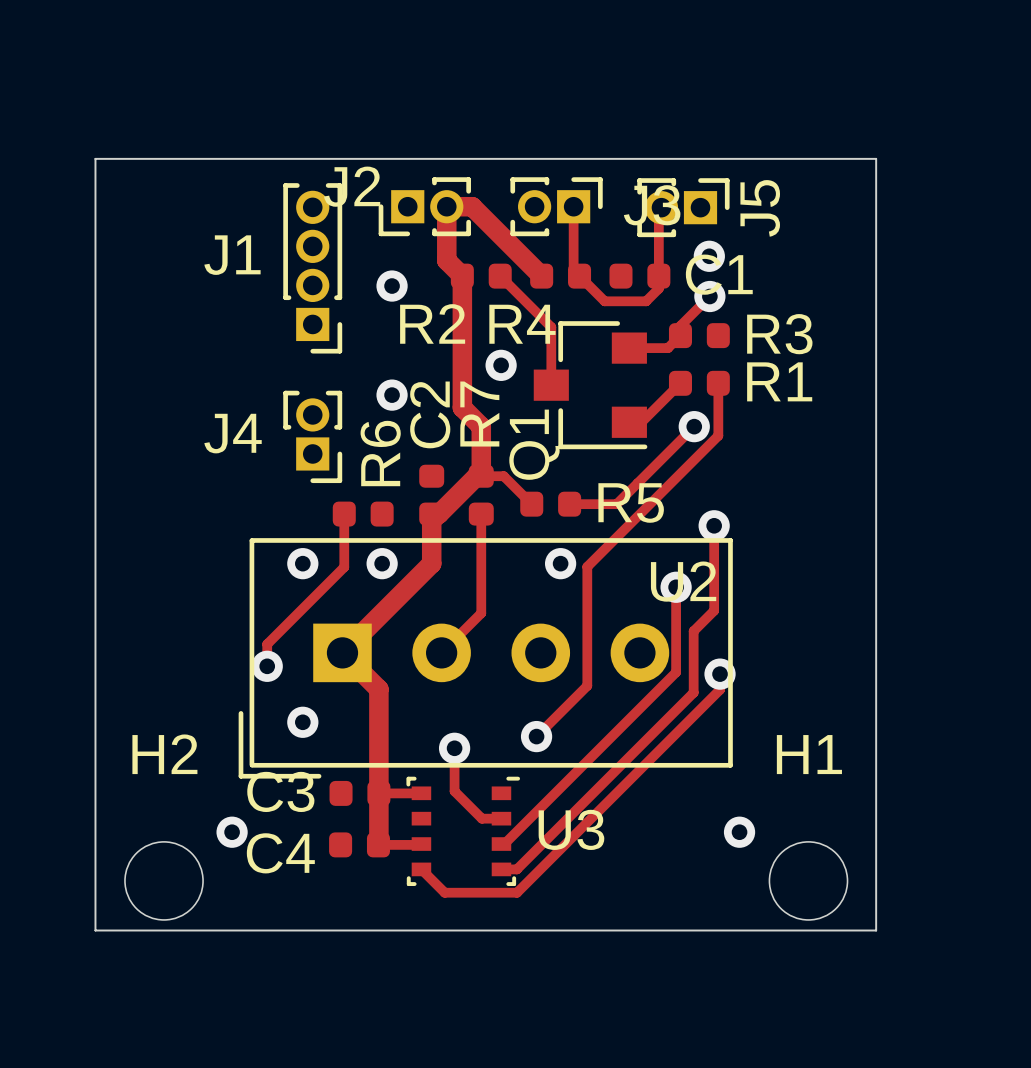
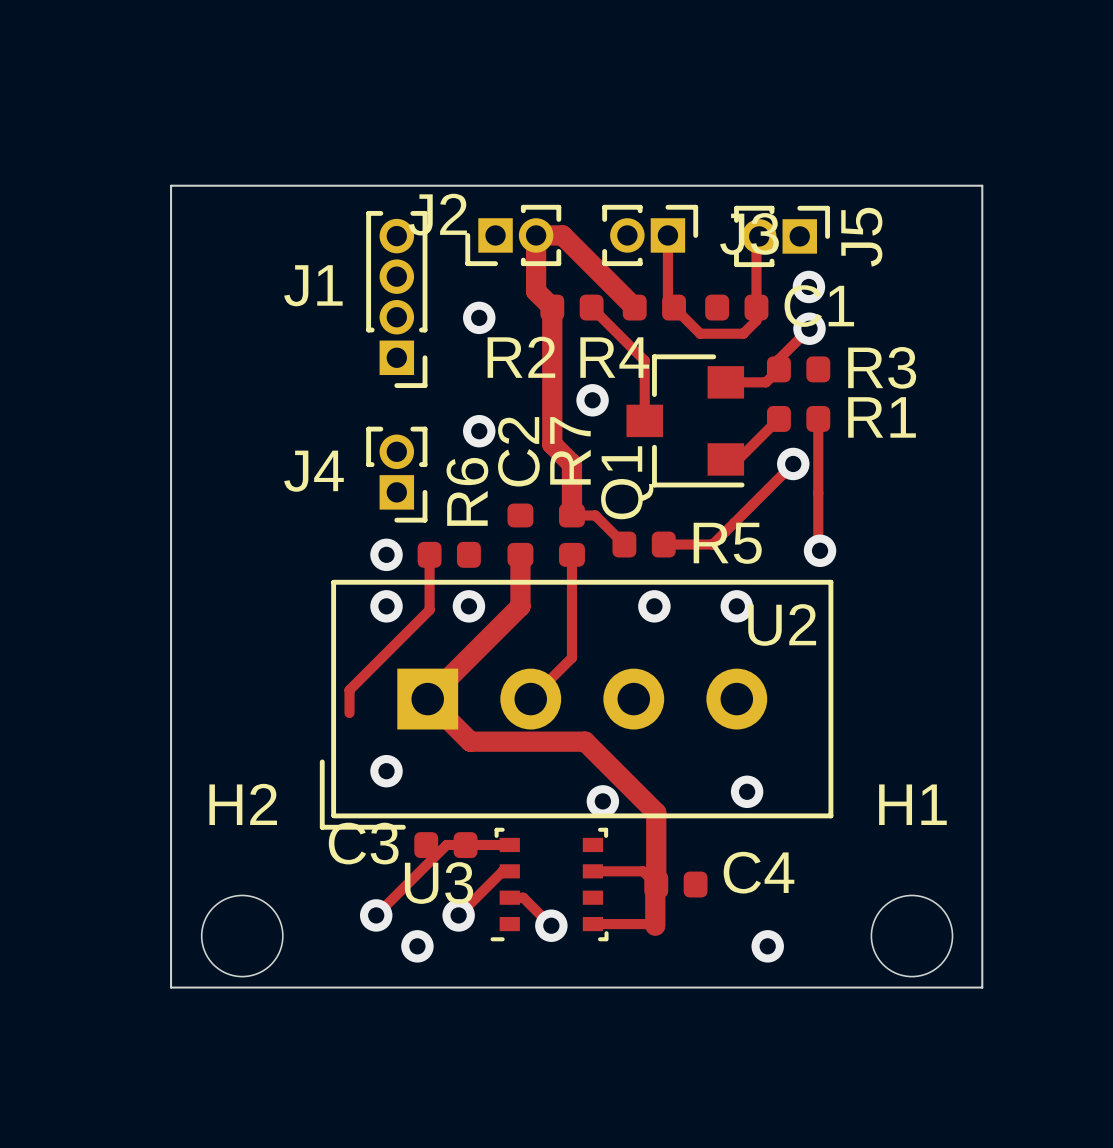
track: (718, 435) (587, 566) (587, 685) (536, 736) -> (818, 473) (818, 549) (820, 550)
track: (481, 476) (476, 476) (438, 514) (431, 514) -> none
via: none -> (386, 554)
track: (714, 525) (714, 610) (693, 631) (693, 692) (516, 869) -> (656, 884) (655, 925) (653, 924) (609, 924)
via position: (714, 525) -> (820, 550)
via: none -> (736, 606)
track: (676, 587) (676, 672) (504, 844) (501, 844) -> none
via: (676, 587) -> none
via: (267, 666) -> none
track: (720, 674) (720, 689) (517, 892) (444, 892) (421, 869) -> none
via: (720, 674) -> none
track: (378, 689) (378, 844) -> (465, 736) (470, 741) (585, 741) (656, 812) (656, 884)
via position: (536, 736) -> (602, 801)
via: none -> (747, 791)
track: (454, 748) (454, 791) (481, 818) (501, 818) -> (656, 884) (643, 871) (592, 871)
via: (454, 748) -> none
track: (378, 793) (421, 793) -> (376, 915) (446, 844) (509, 844)
track: none -> (509, 871) (502, 871) (458, 915)
U3 rotation: 0° (463, 831) -> 180° (549, 884)
via: (232, 832) -> none
via: (739, 832) -> none
C4 position: (359, 844) -> (675, 884)
track: (421, 844) (378, 844) -> (509, 897) (523, 897) (551, 925)
C4 name position: C4 (280, 853) -> C4 (758, 872)
via: none -> (376, 915)
via: none -> (458, 915)
via: none -> (551, 925)
via: none -> (417, 946)
via: none -> (767, 946)

